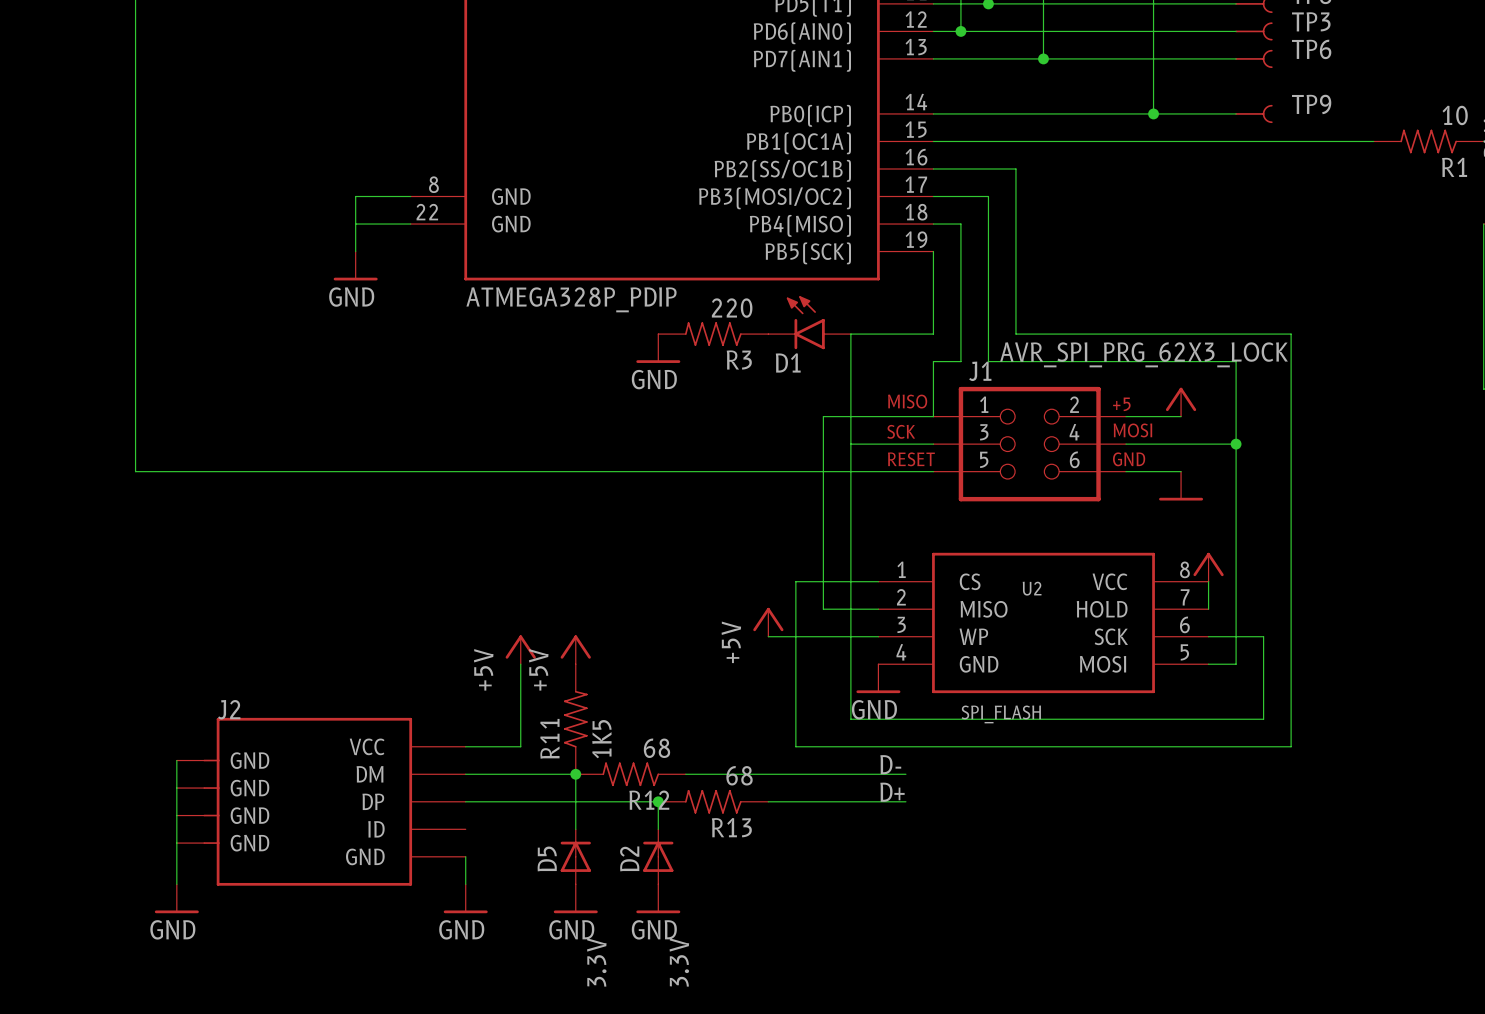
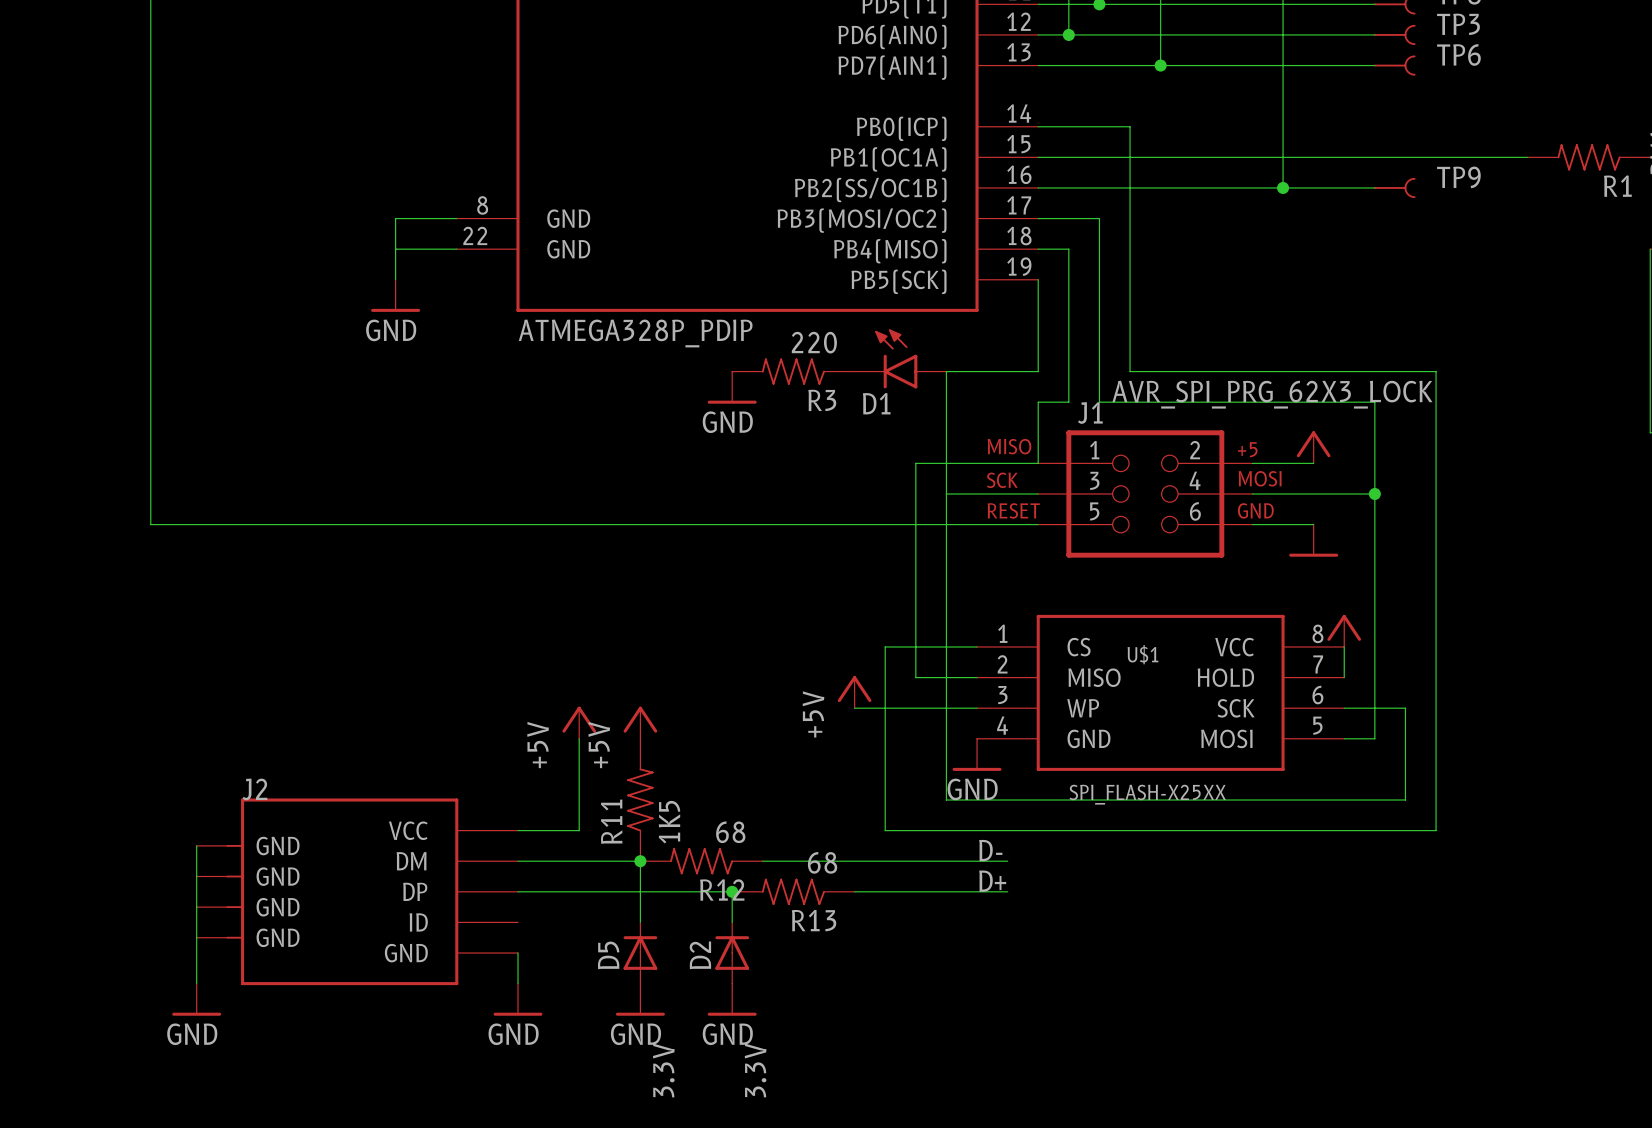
wire: (1015, 113) (1236, 113) -> (1130, 126) (1130, 187) (1374, 187)
wire: none -> (1283, 126) (1283, 187)
junction position: (1153, 113) -> (1283, 187)
TP9 position: (1253, 113) -> (1394, 187)
R1 value: 10 (1455, 115) -> none
U2 name: U2 (1032, 588) -> U$1 (1142, 654)
U2 value: SPI_FLASH (1001, 714) -> SPI_FLASH-X25XX (1147, 794)

